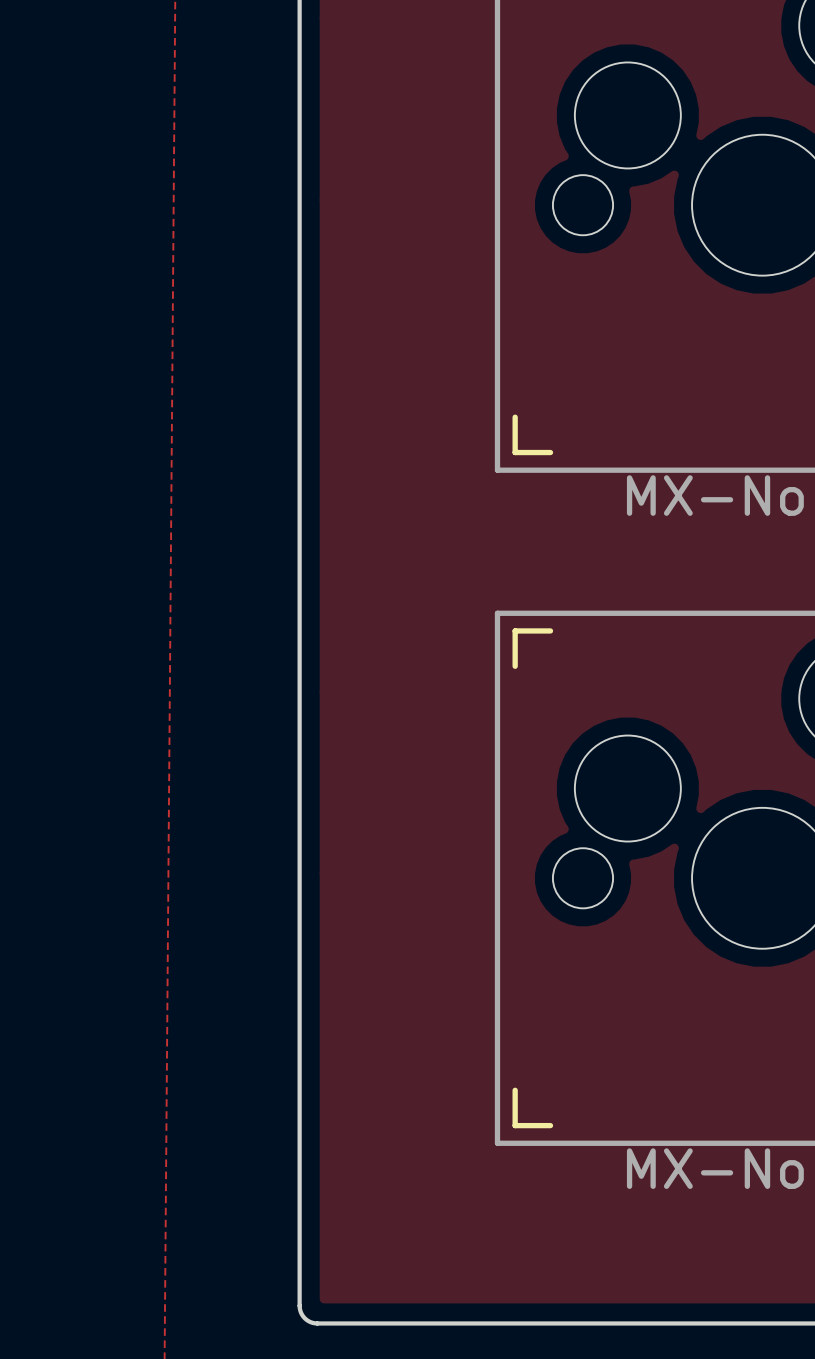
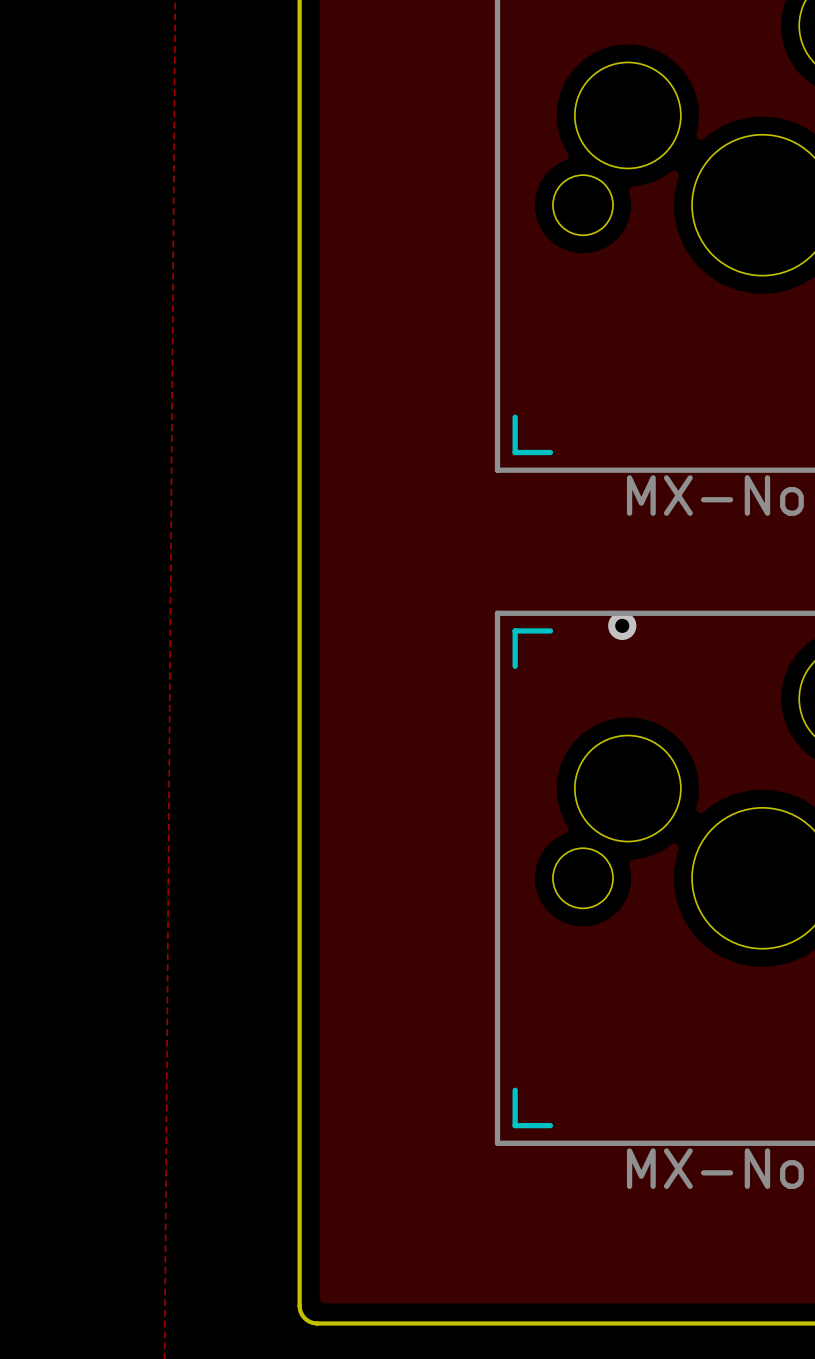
via: none -> (622, 625)

